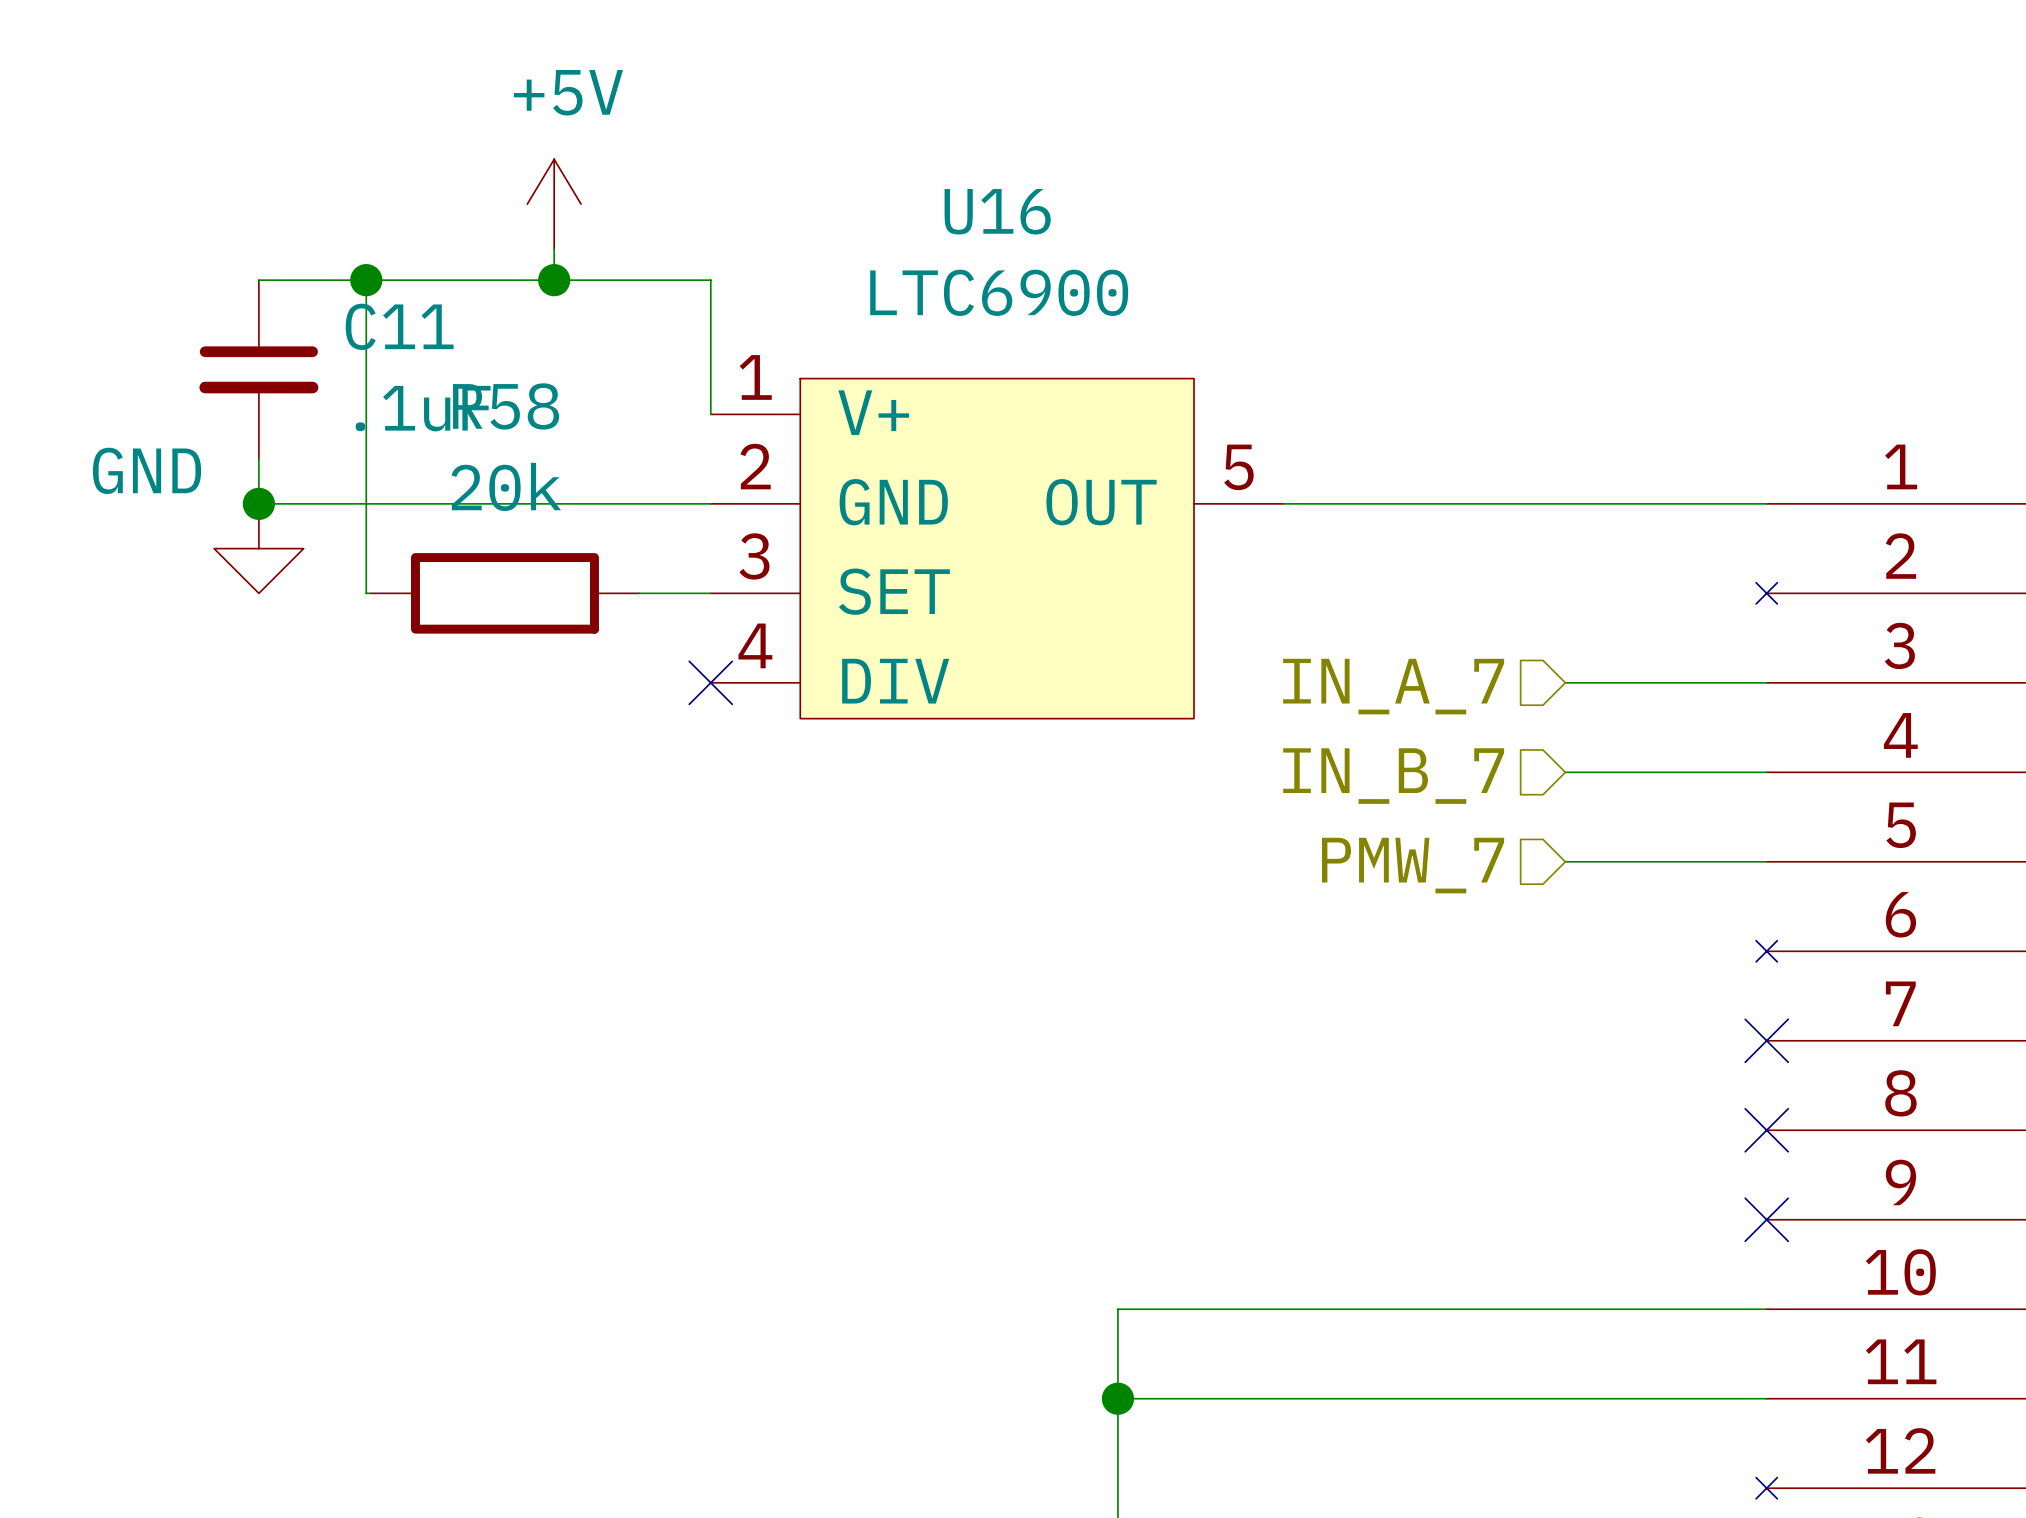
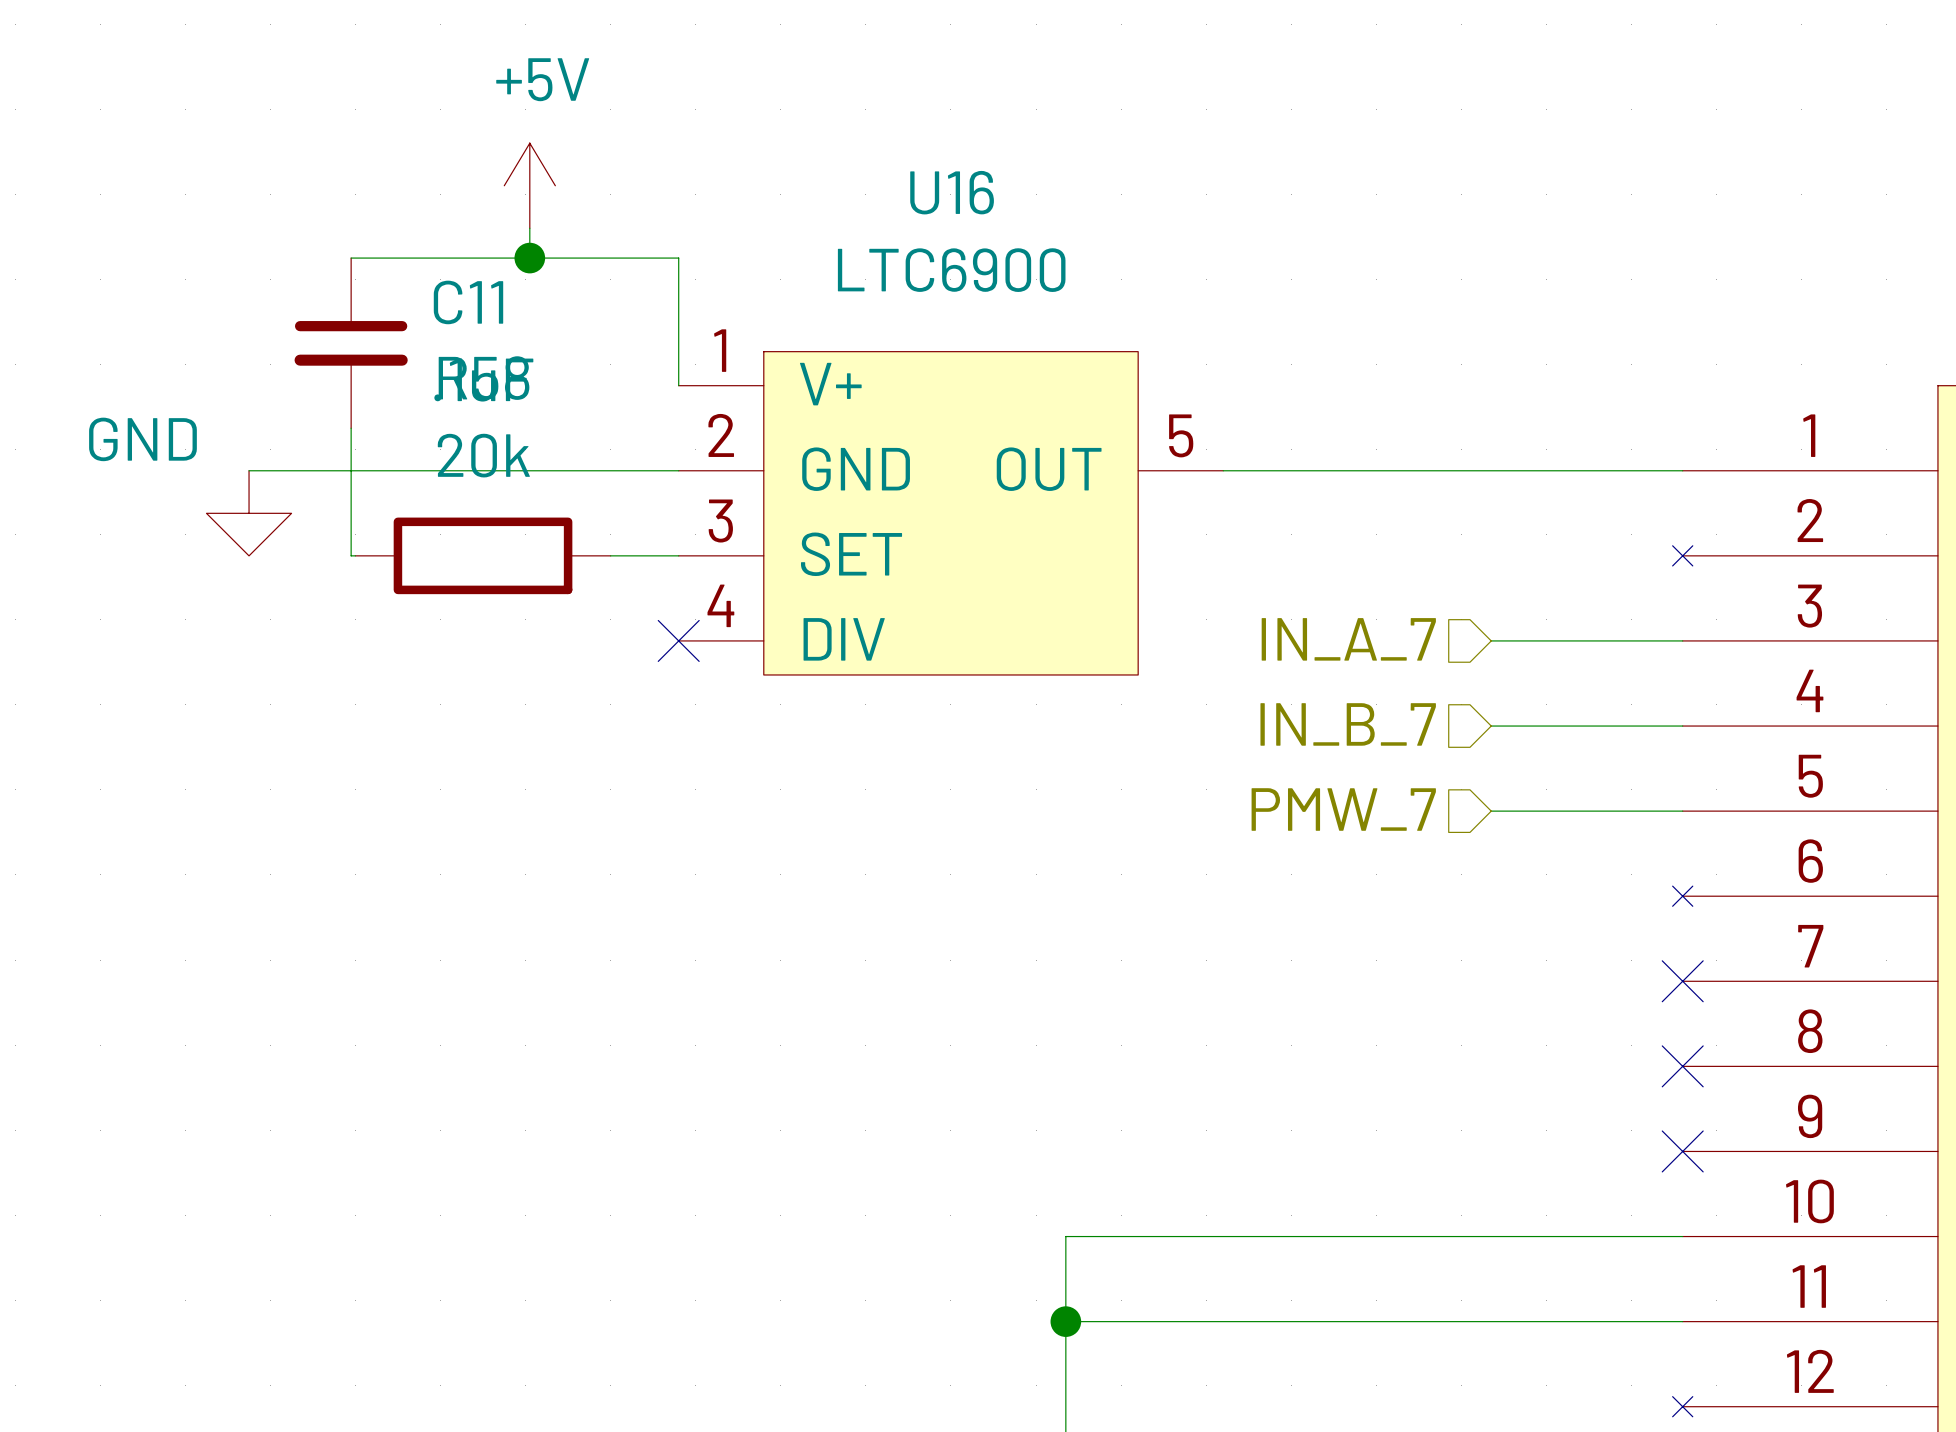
wire: (258, 280) (366, 280) (366, 459) -> none
junction: (366, 280) -> none
C11 position: (258, 369) -> (351, 343)
wire: (258, 459) (258, 503) -> none
junction: (258, 503) -> none

